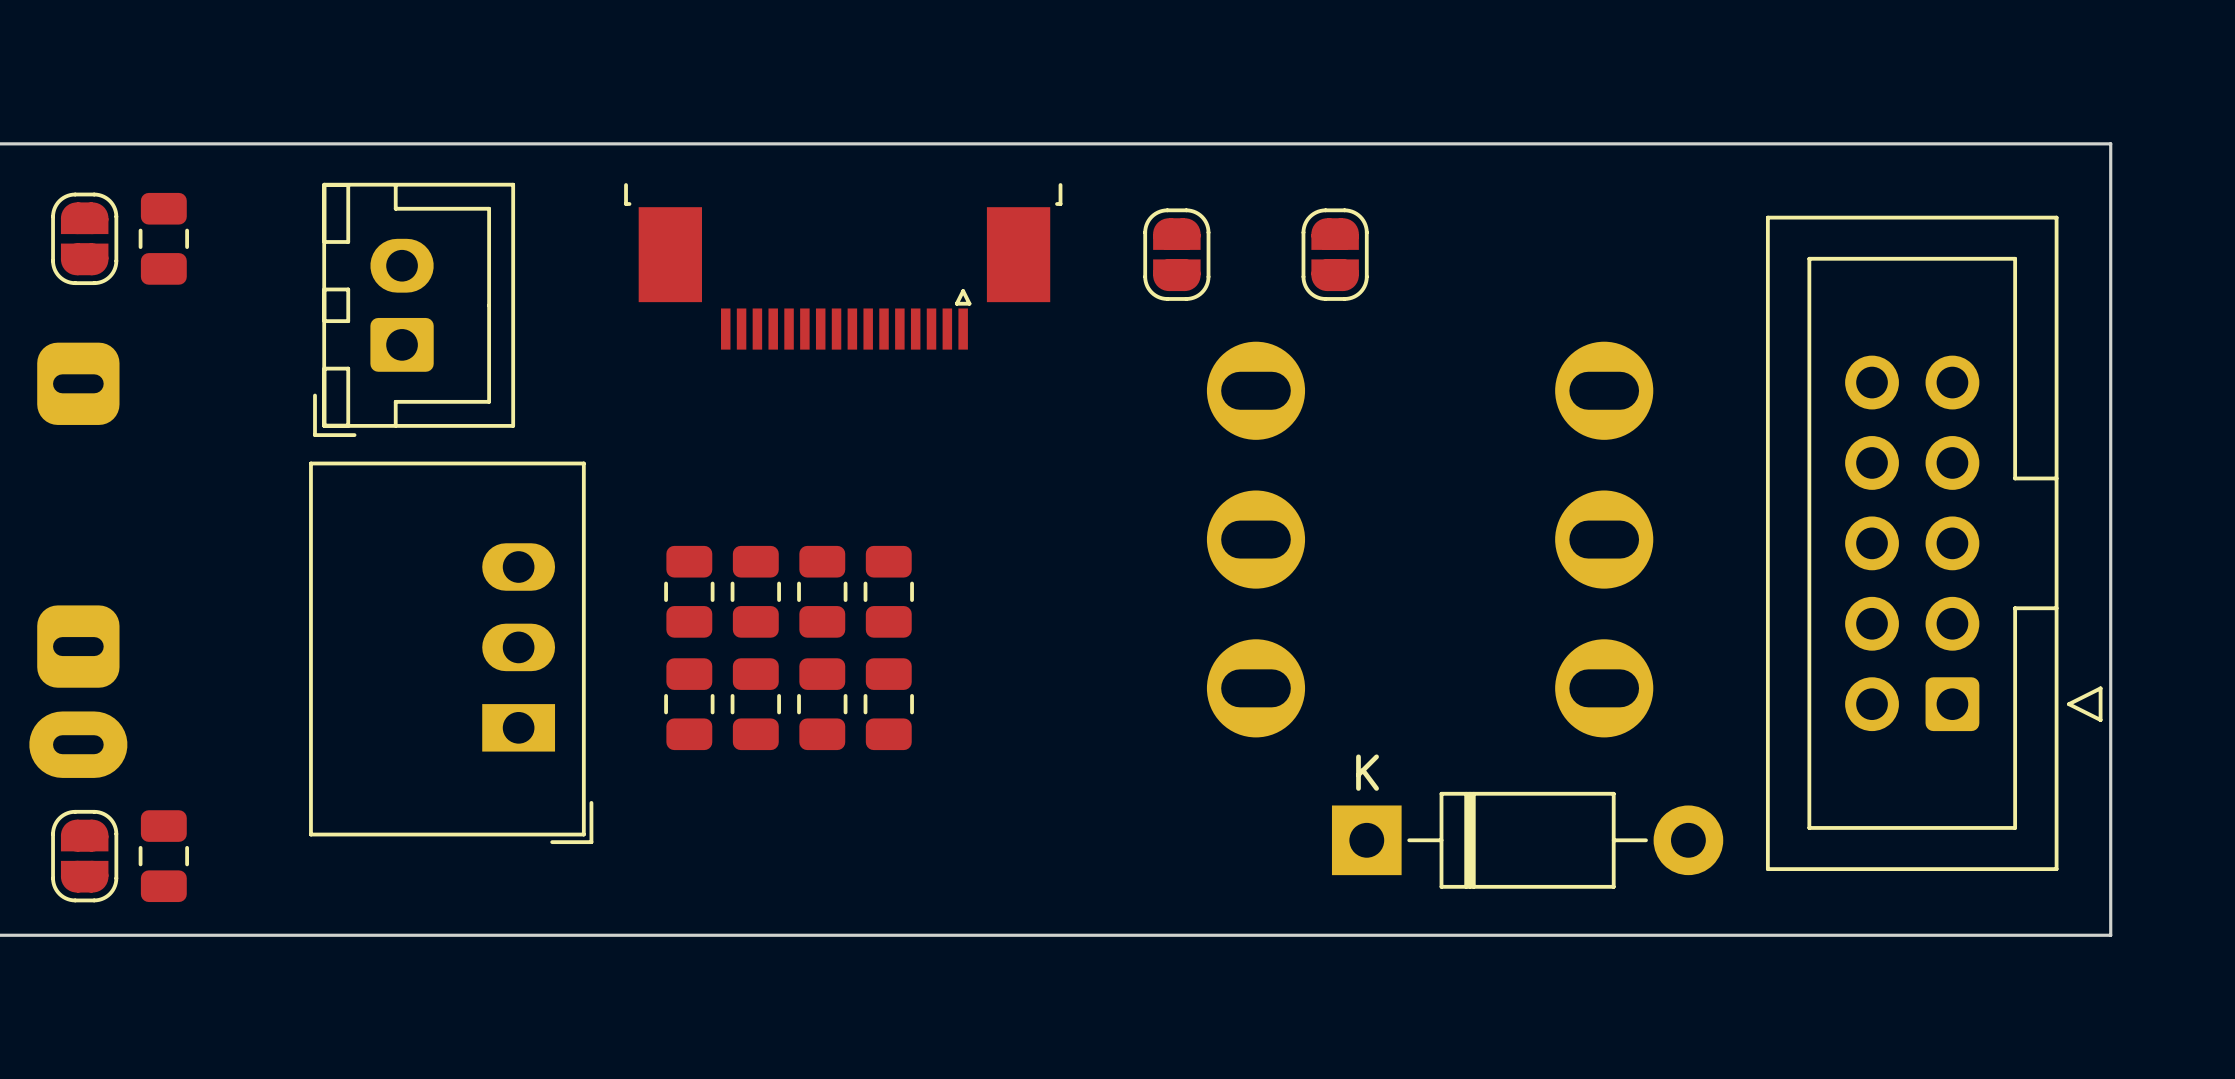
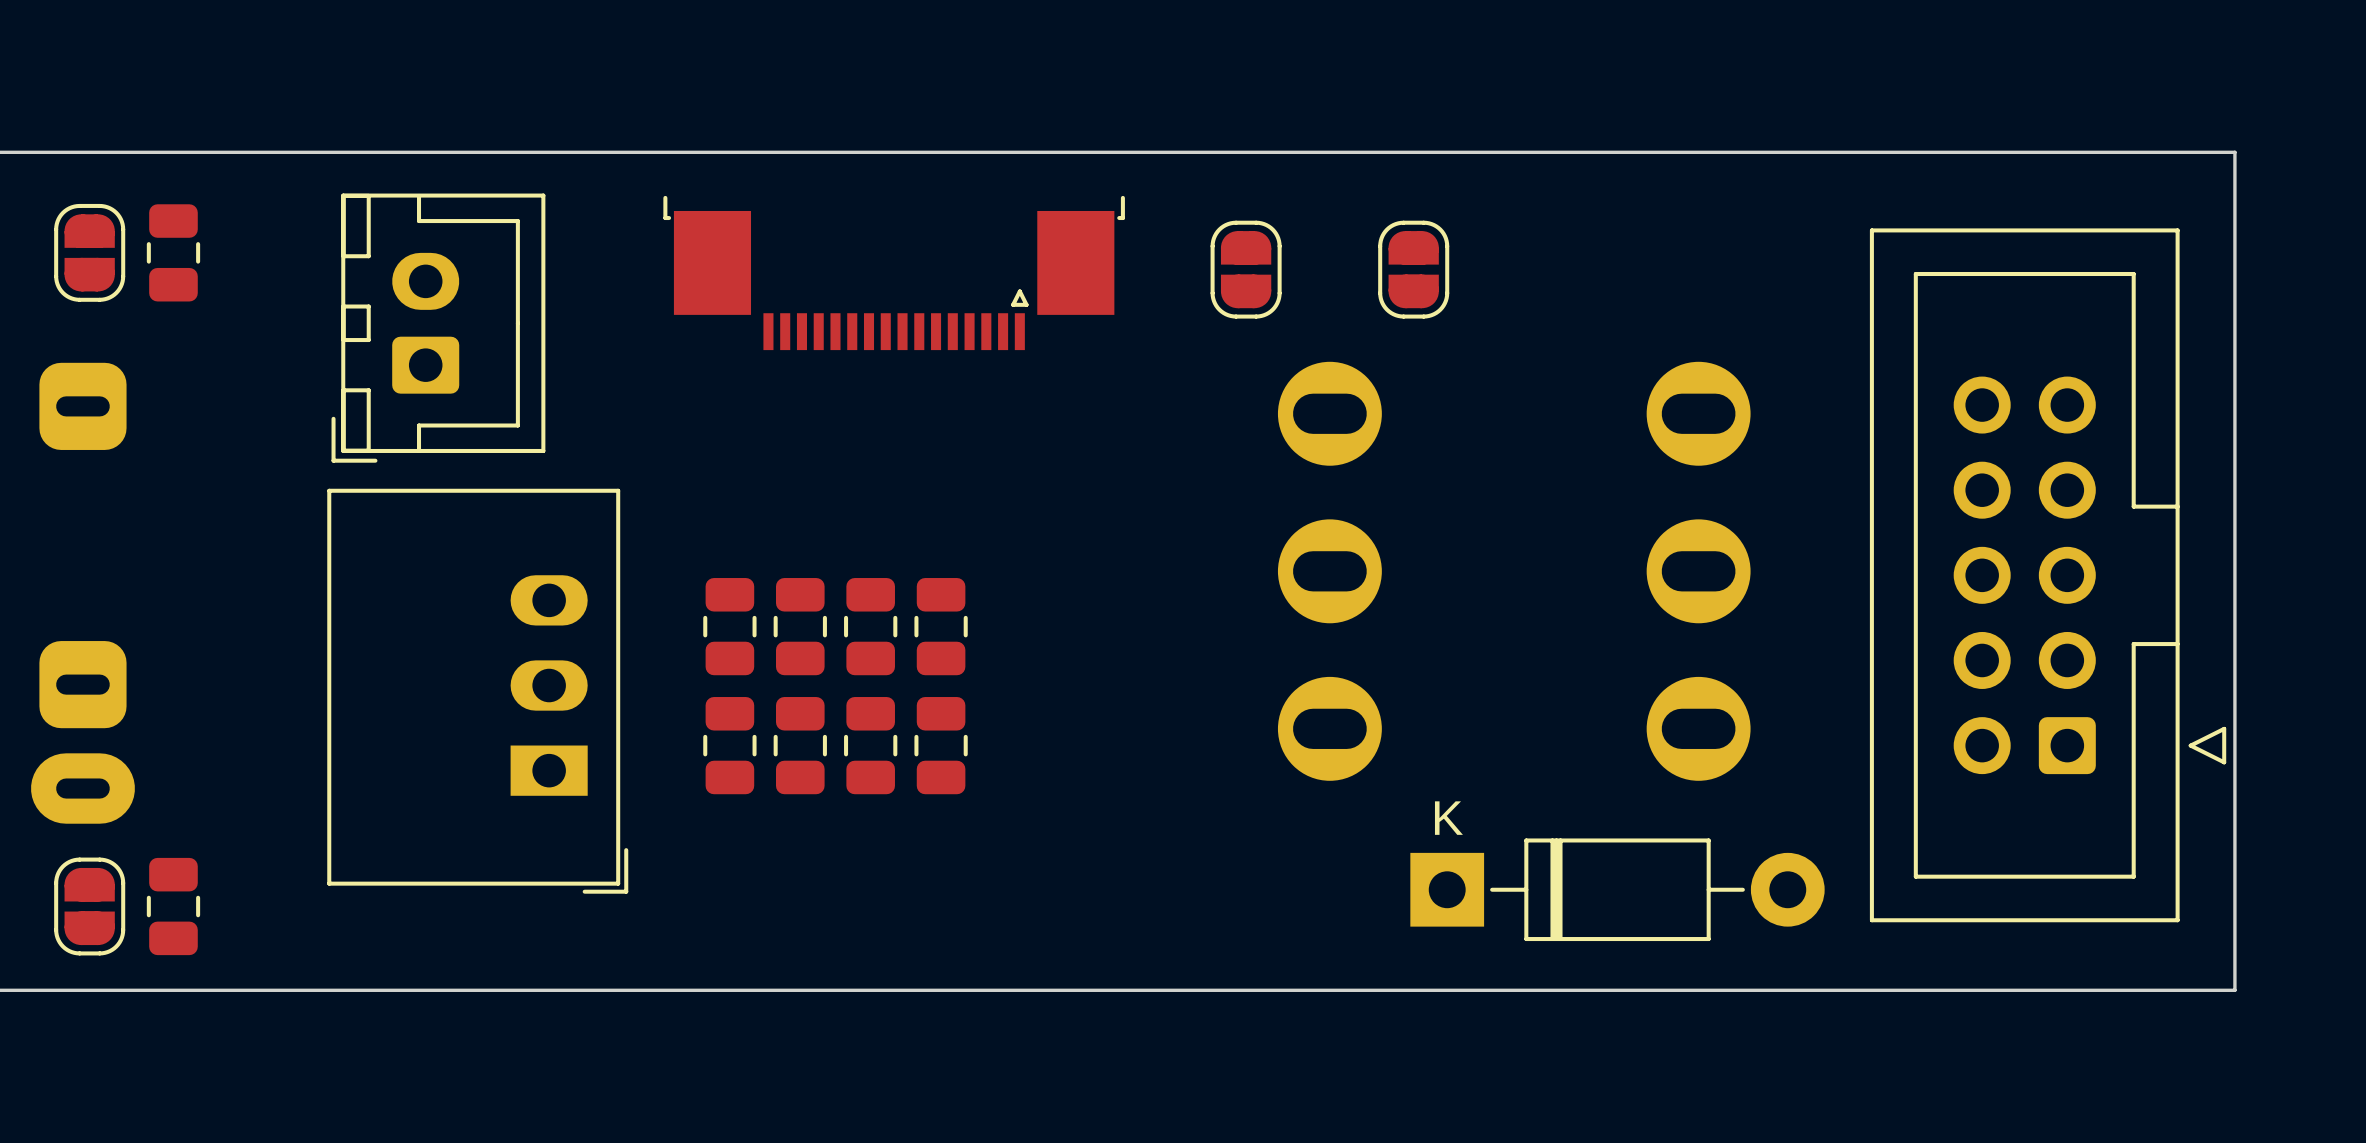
part footprint: [624, 183, 1063, 350] -> [663, 195, 1125, 351]

